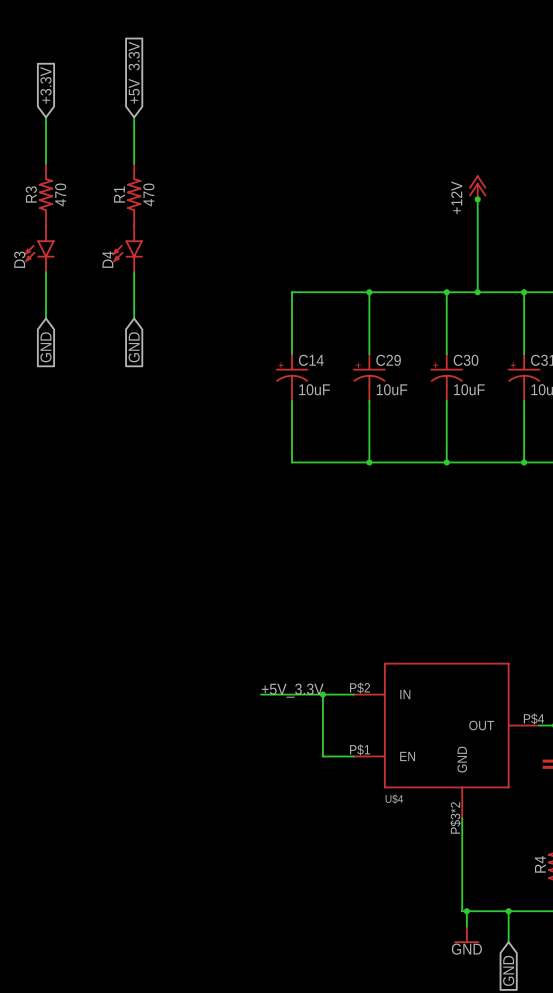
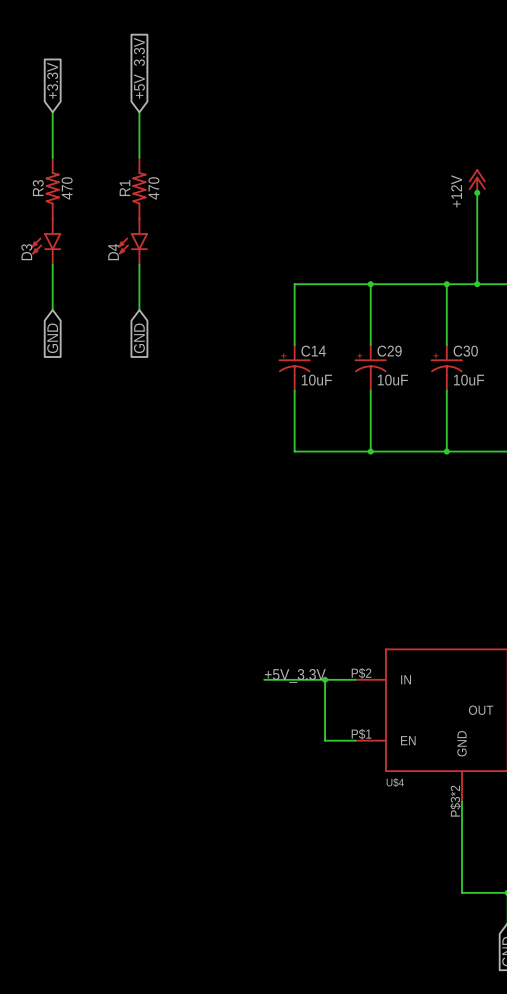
wire: (466, 911) (466, 926) -> none
junction: (466, 911) -> none
power symbol: GND (466, 934) -> none

